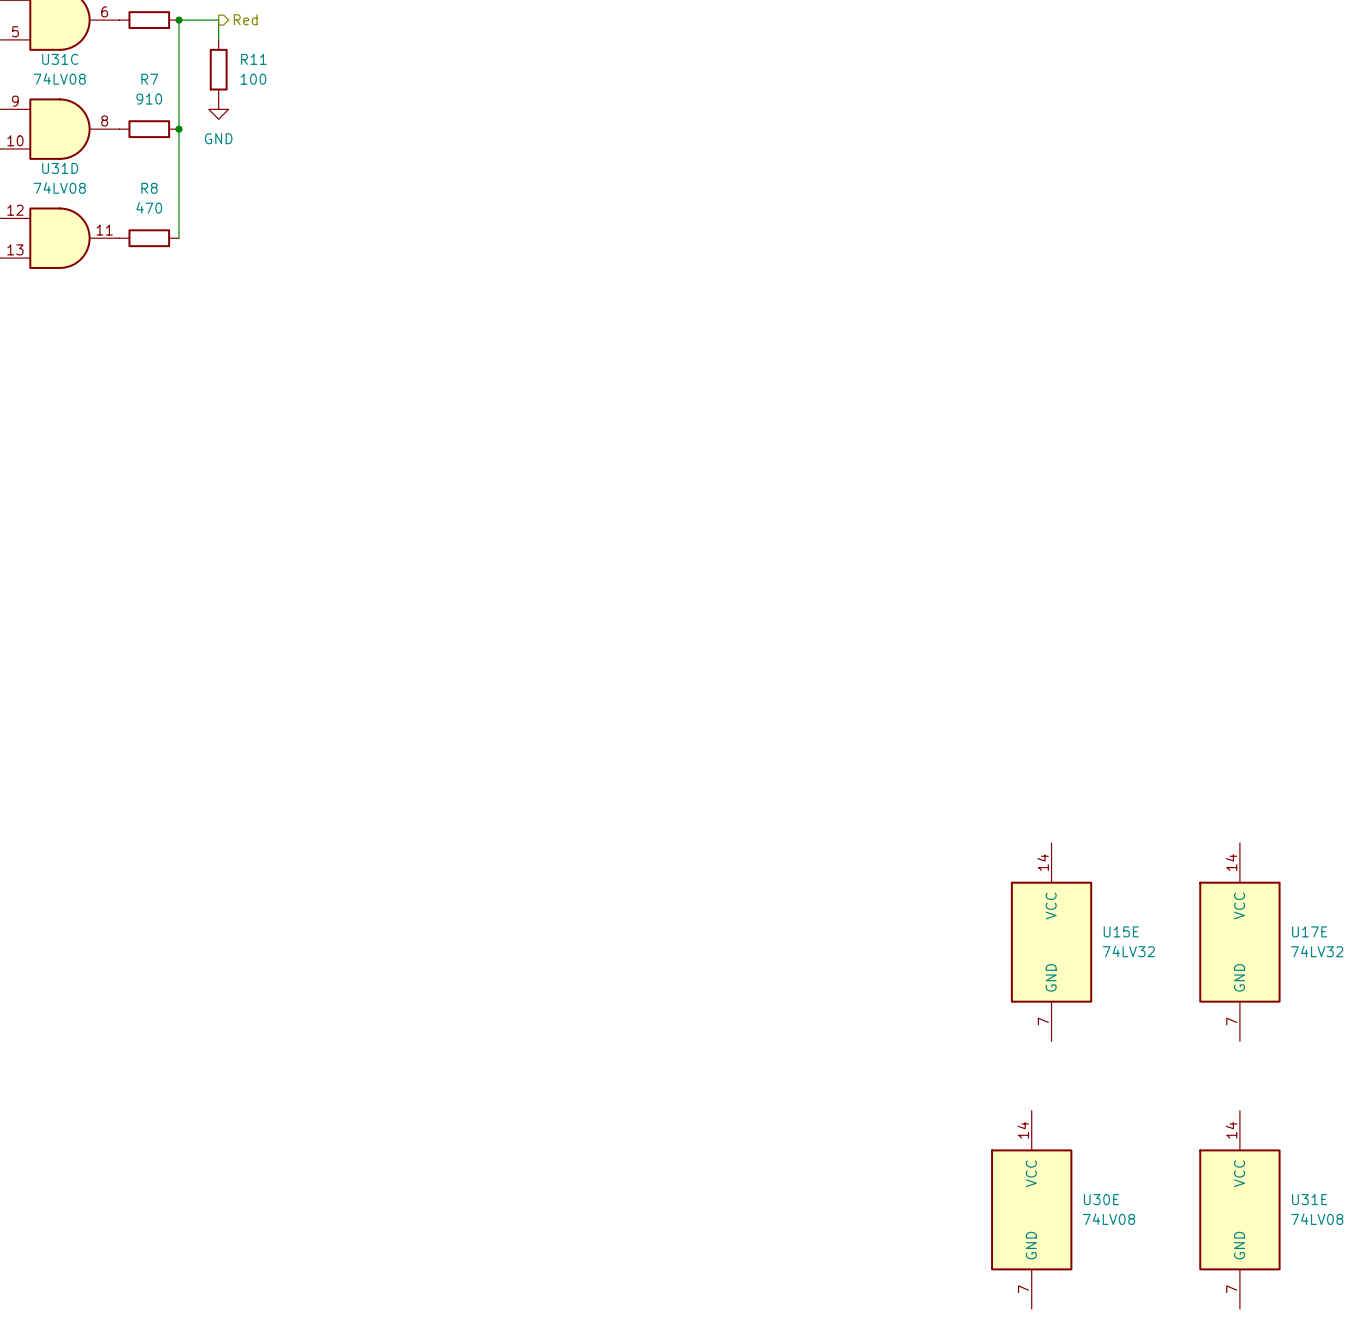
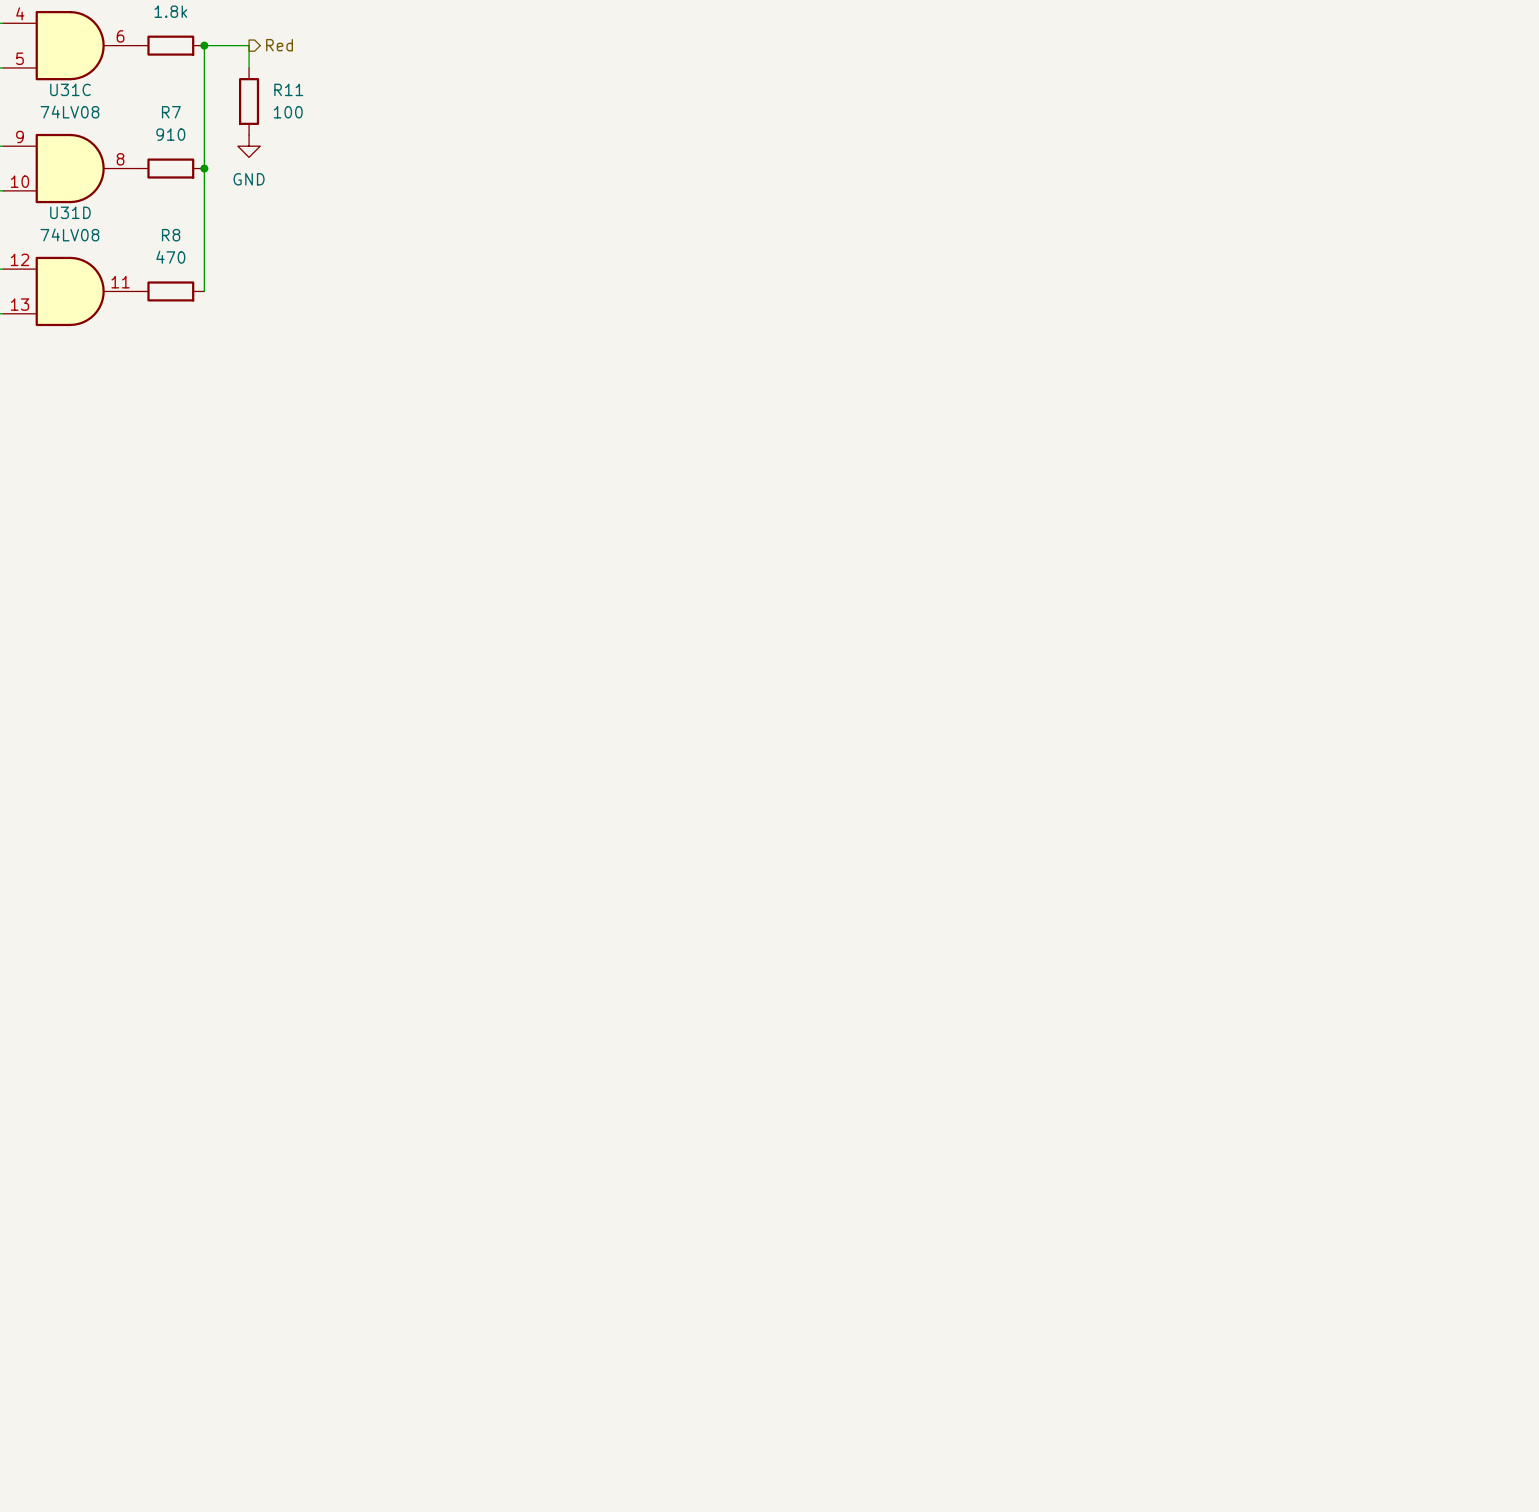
U15E: 74LV32 (1051, 942) -> none
U17E: 74LV32 (1239, 942) -> none
U30E: 74LV08 (1031, 1209) -> none
U31E: 74LV08 (1239, 1209) -> none

